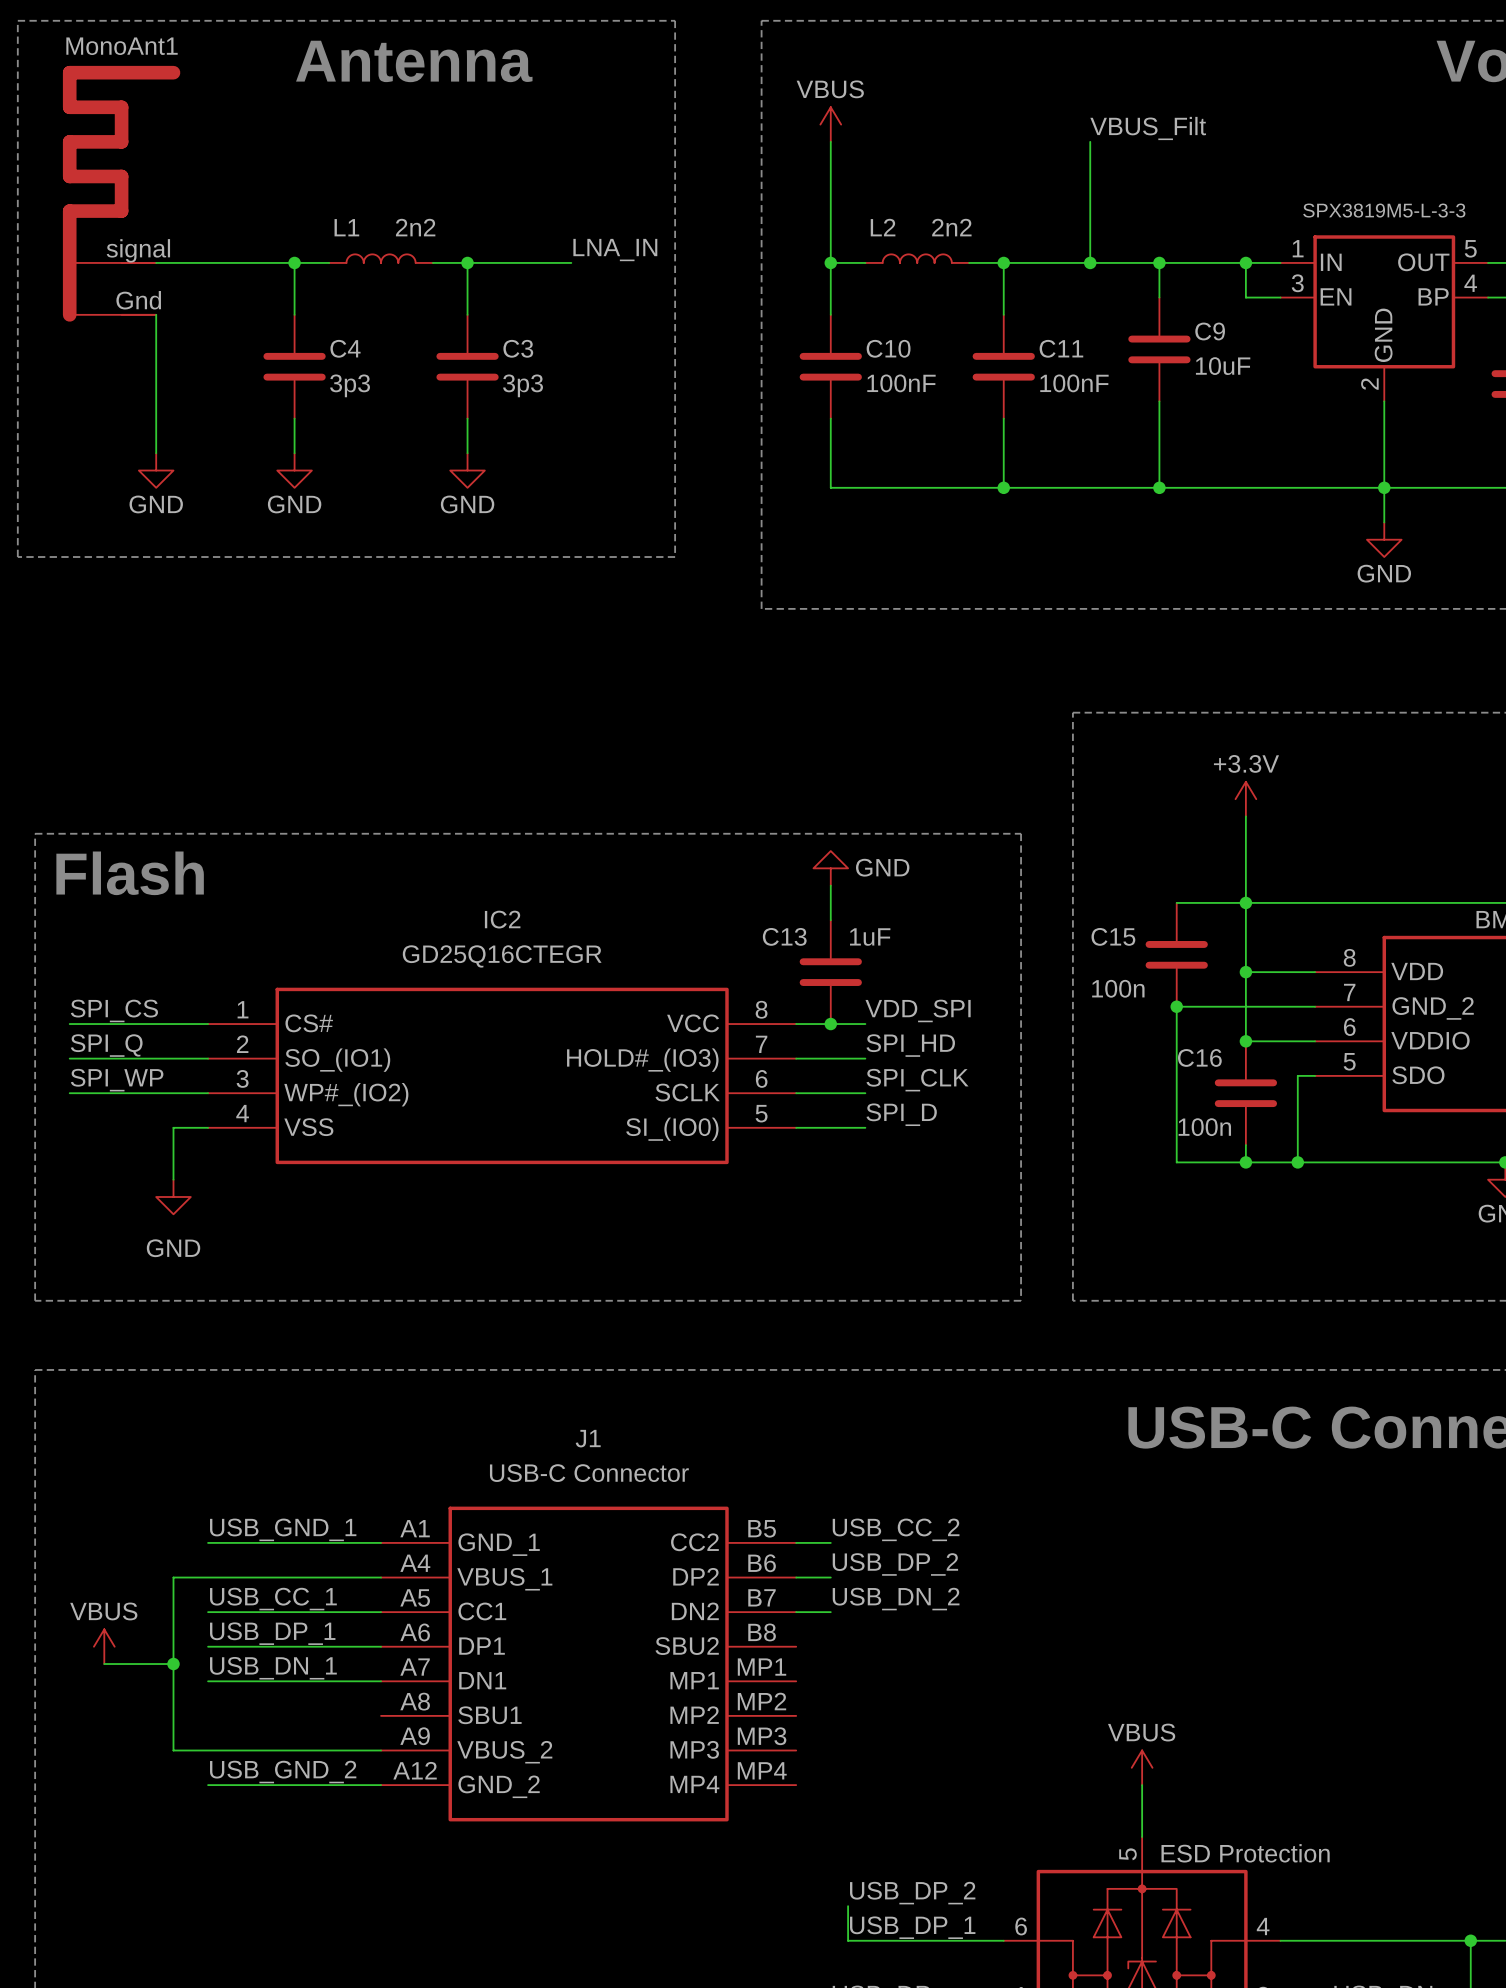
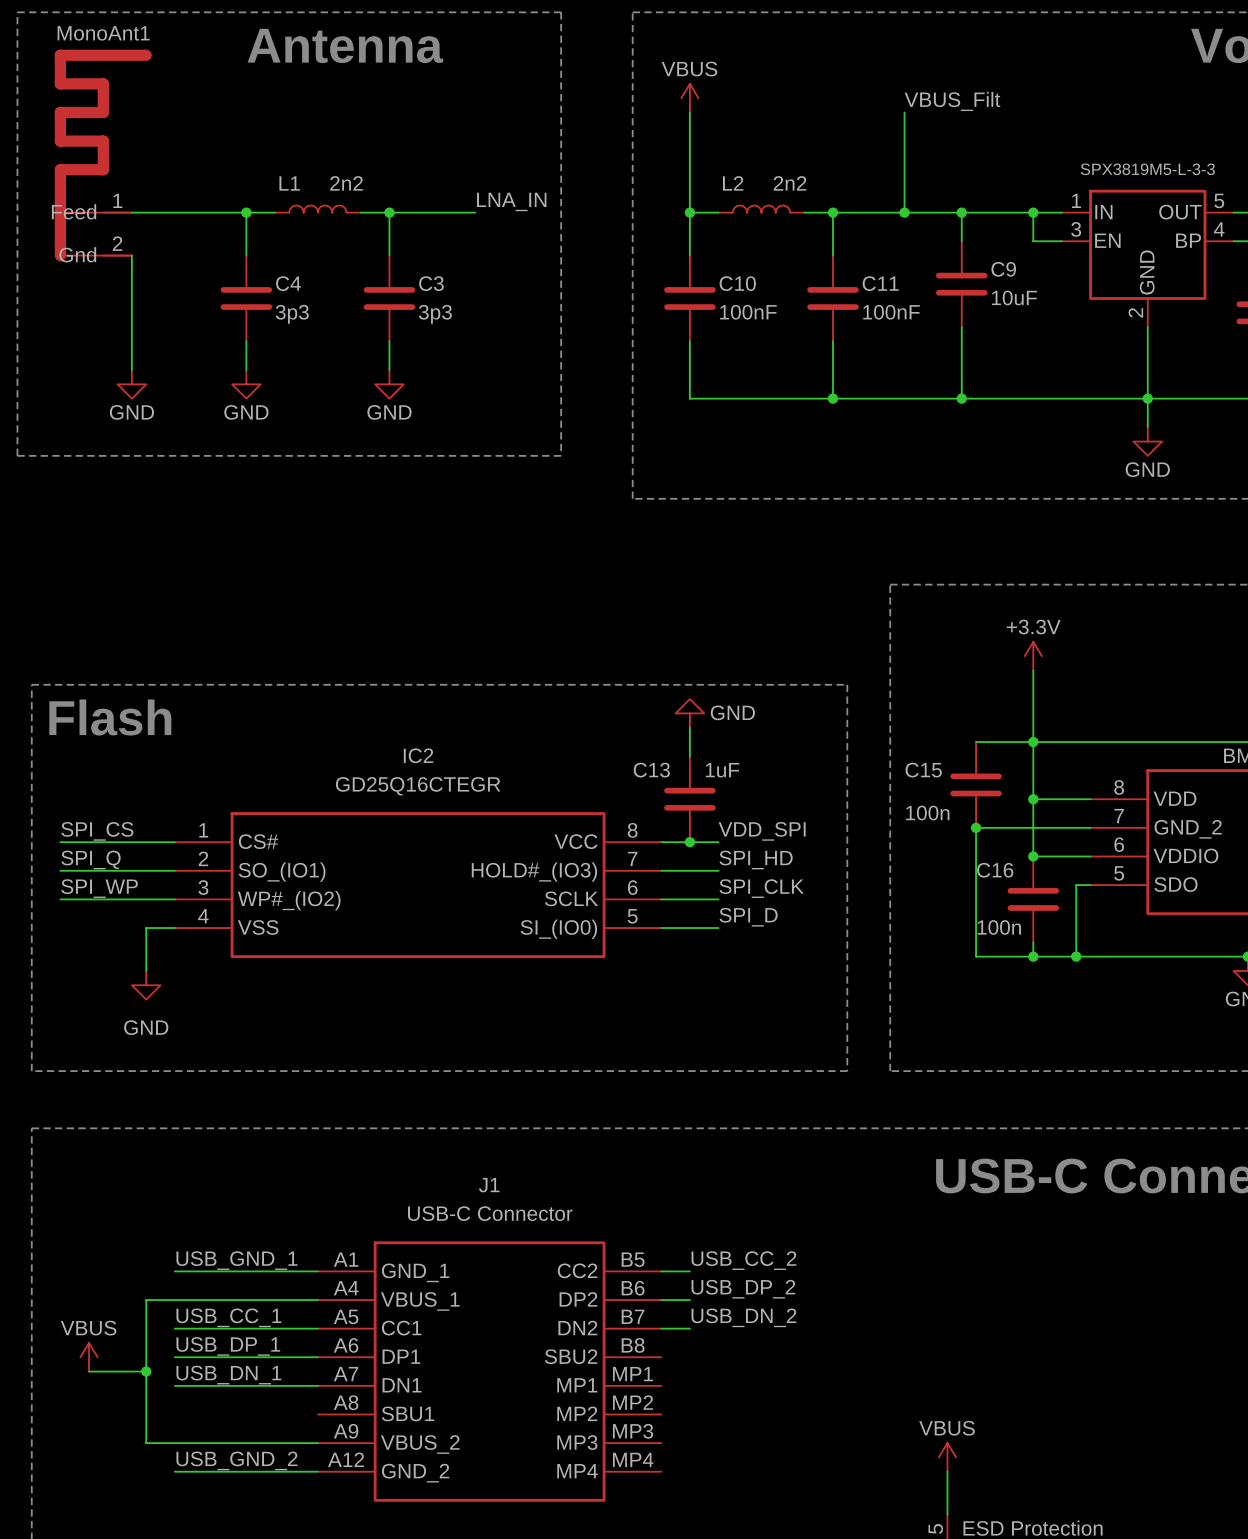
MonoAnt1 pin number: signal (138, 250) -> 1 (117, 200)
MonoAnt1 pin name: none -> Feed (74, 211)
MonoAnt1 pin number: Gnd (138, 300) -> 2 (117, 243)
MonoAnt1 pin name: none -> Gnd (77, 254)

